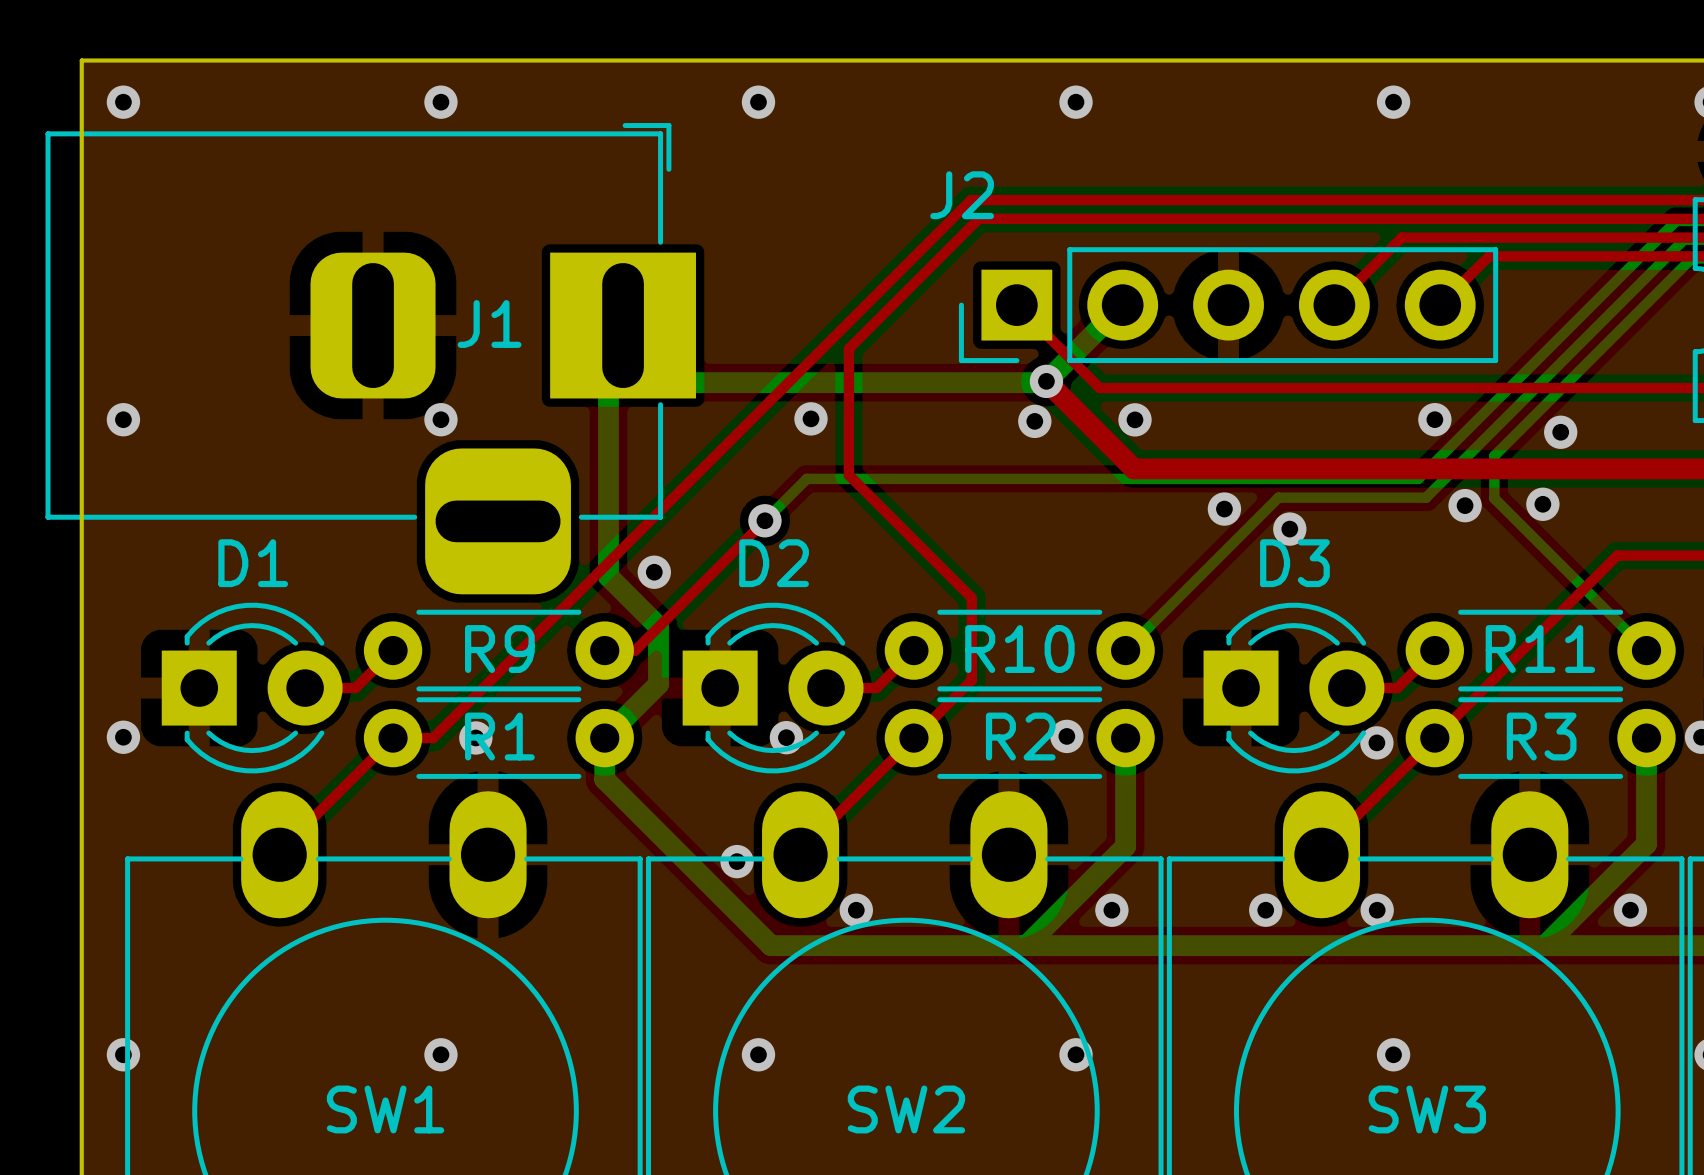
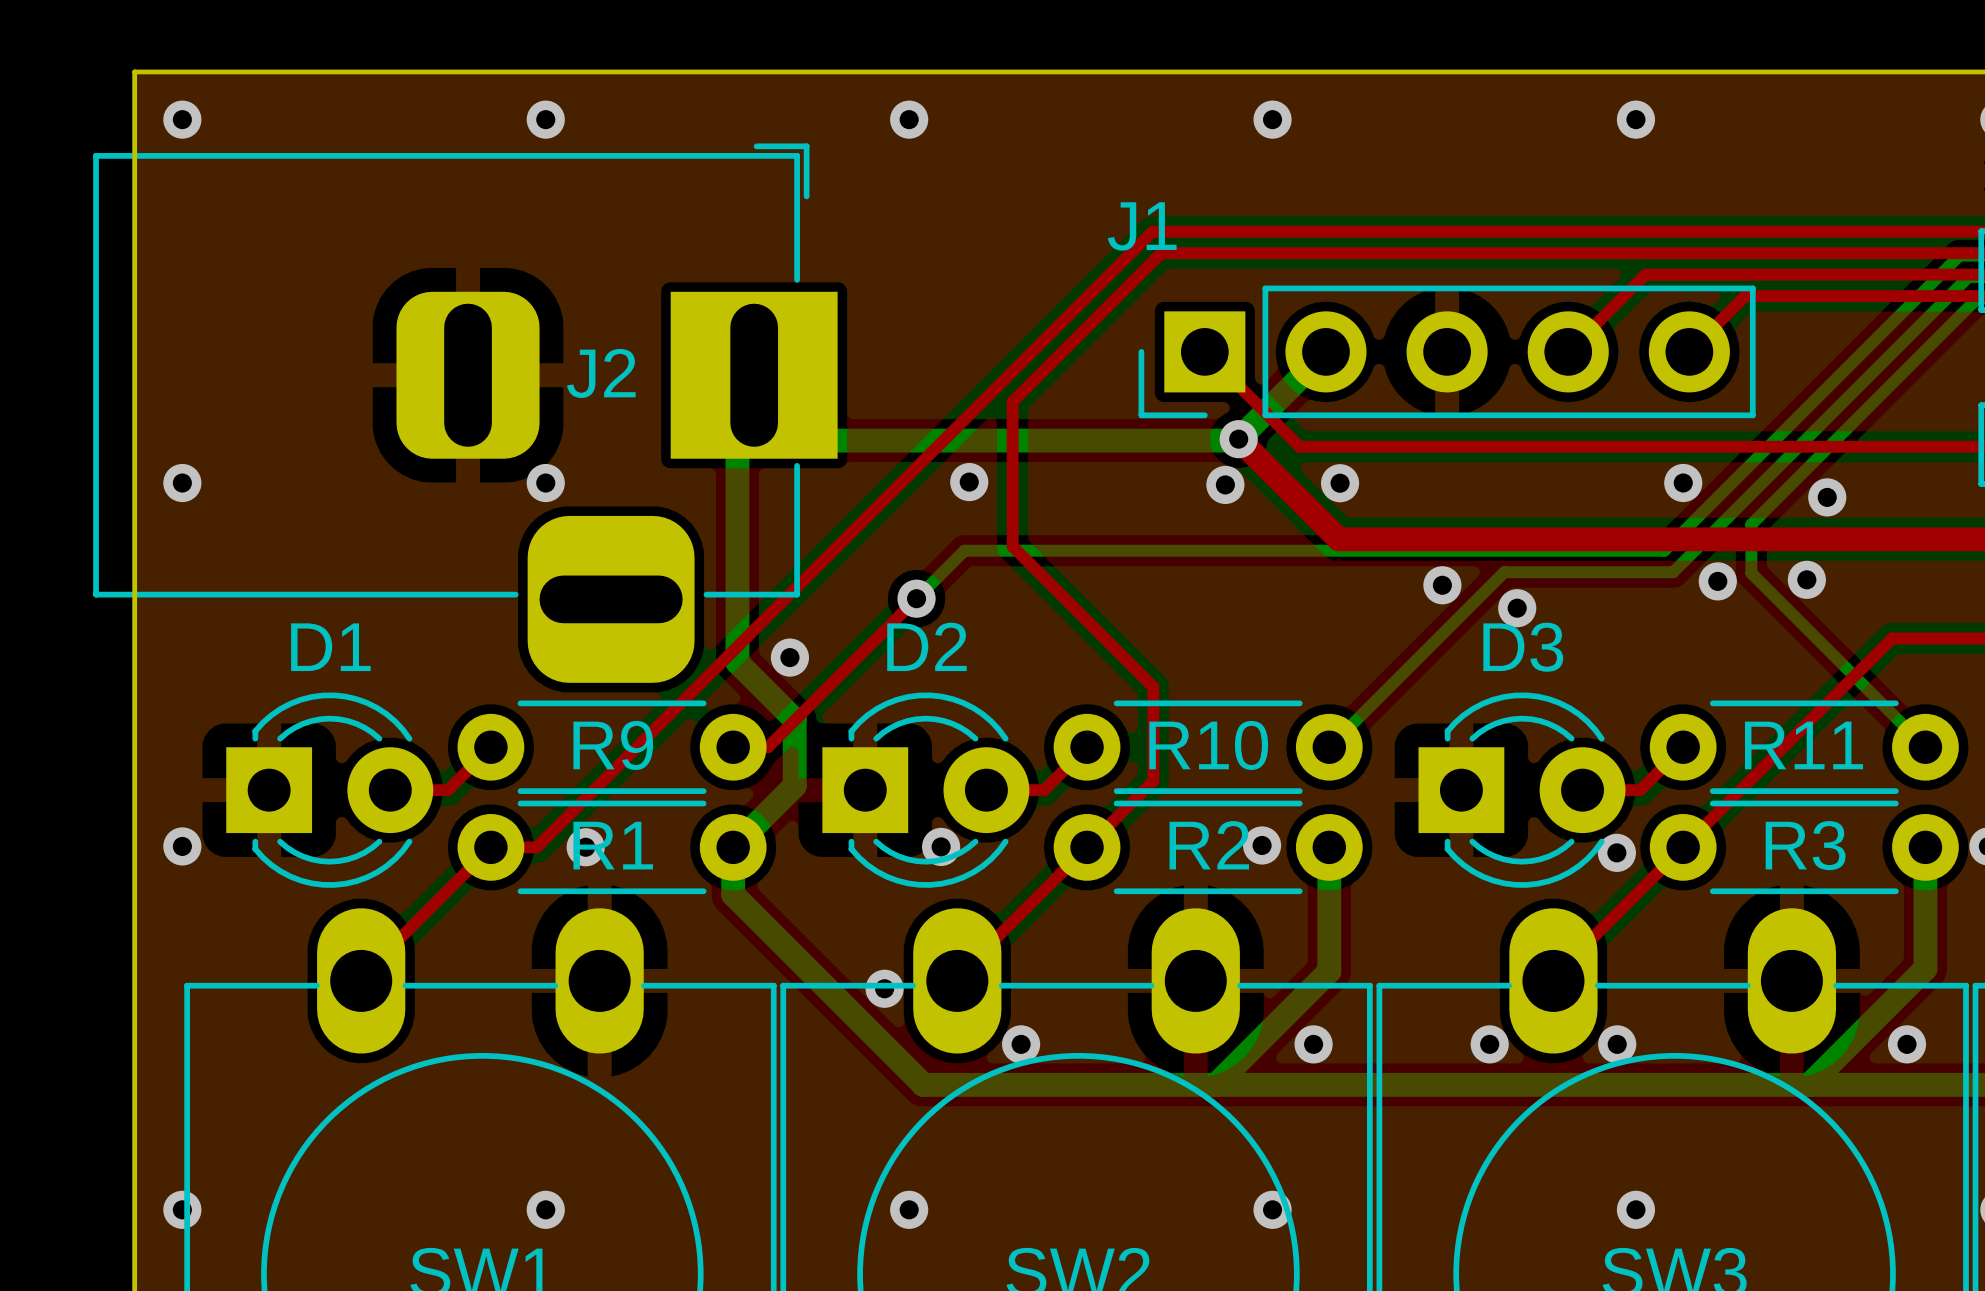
J2 name: J2 (962, 195) -> J1 (1142, 226)
J1 name: J1 (489, 323) -> J2 (601, 373)

